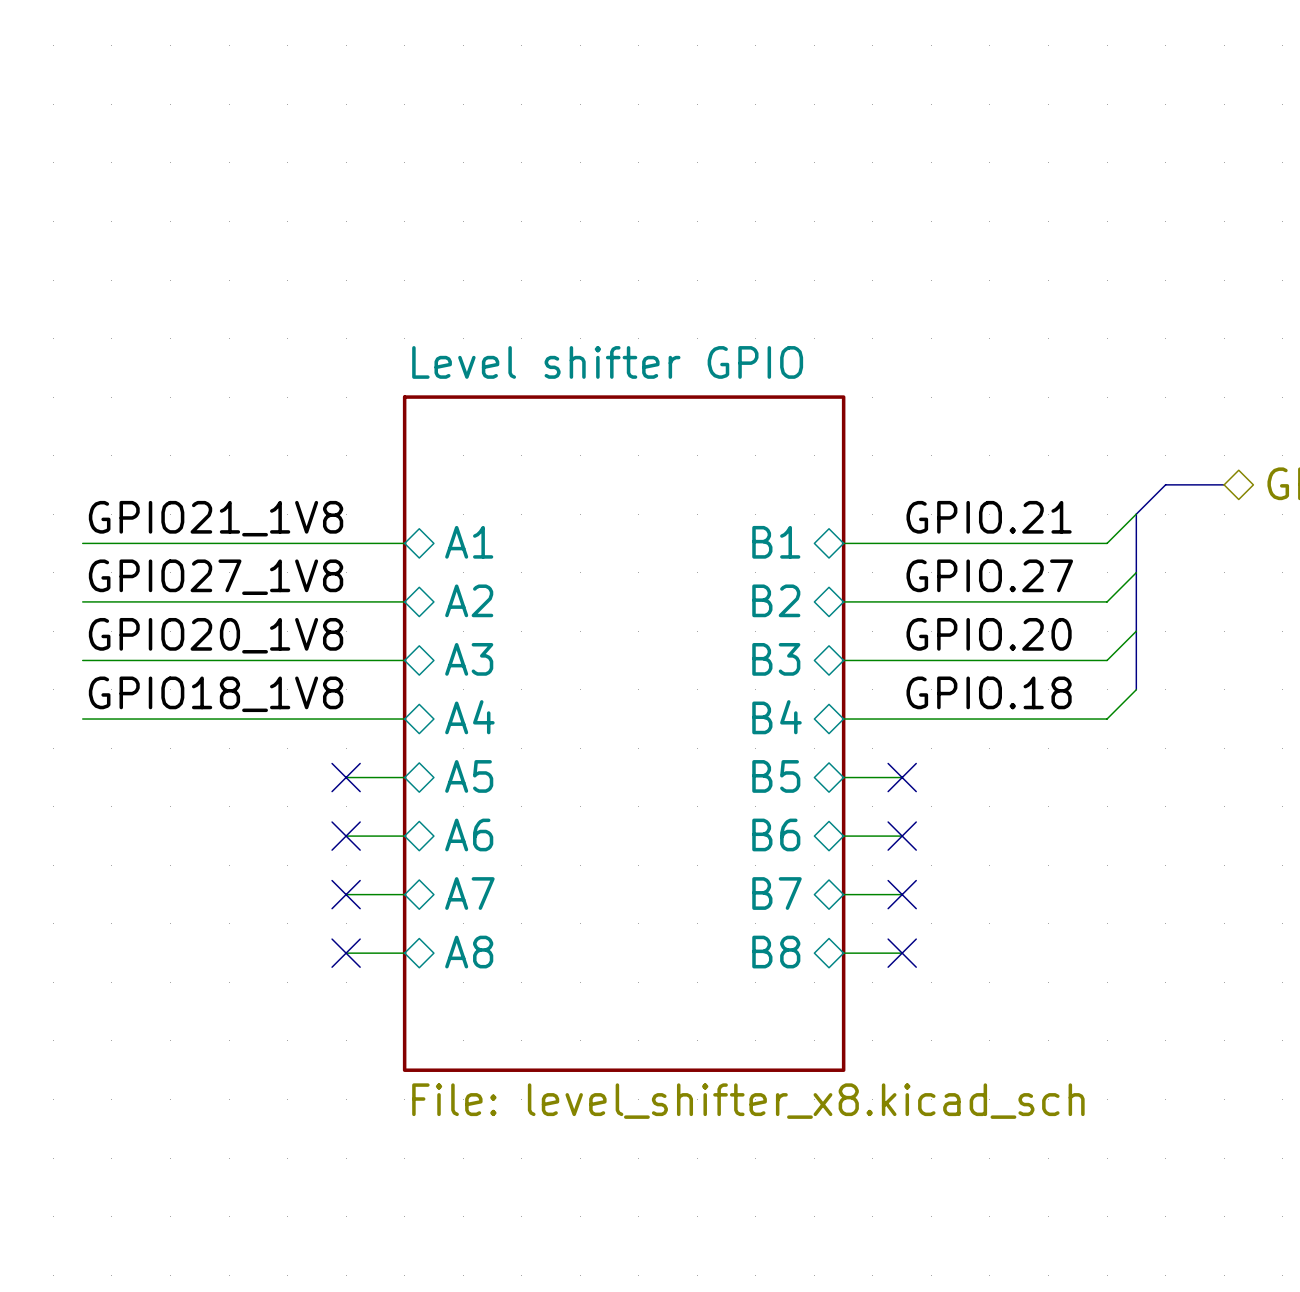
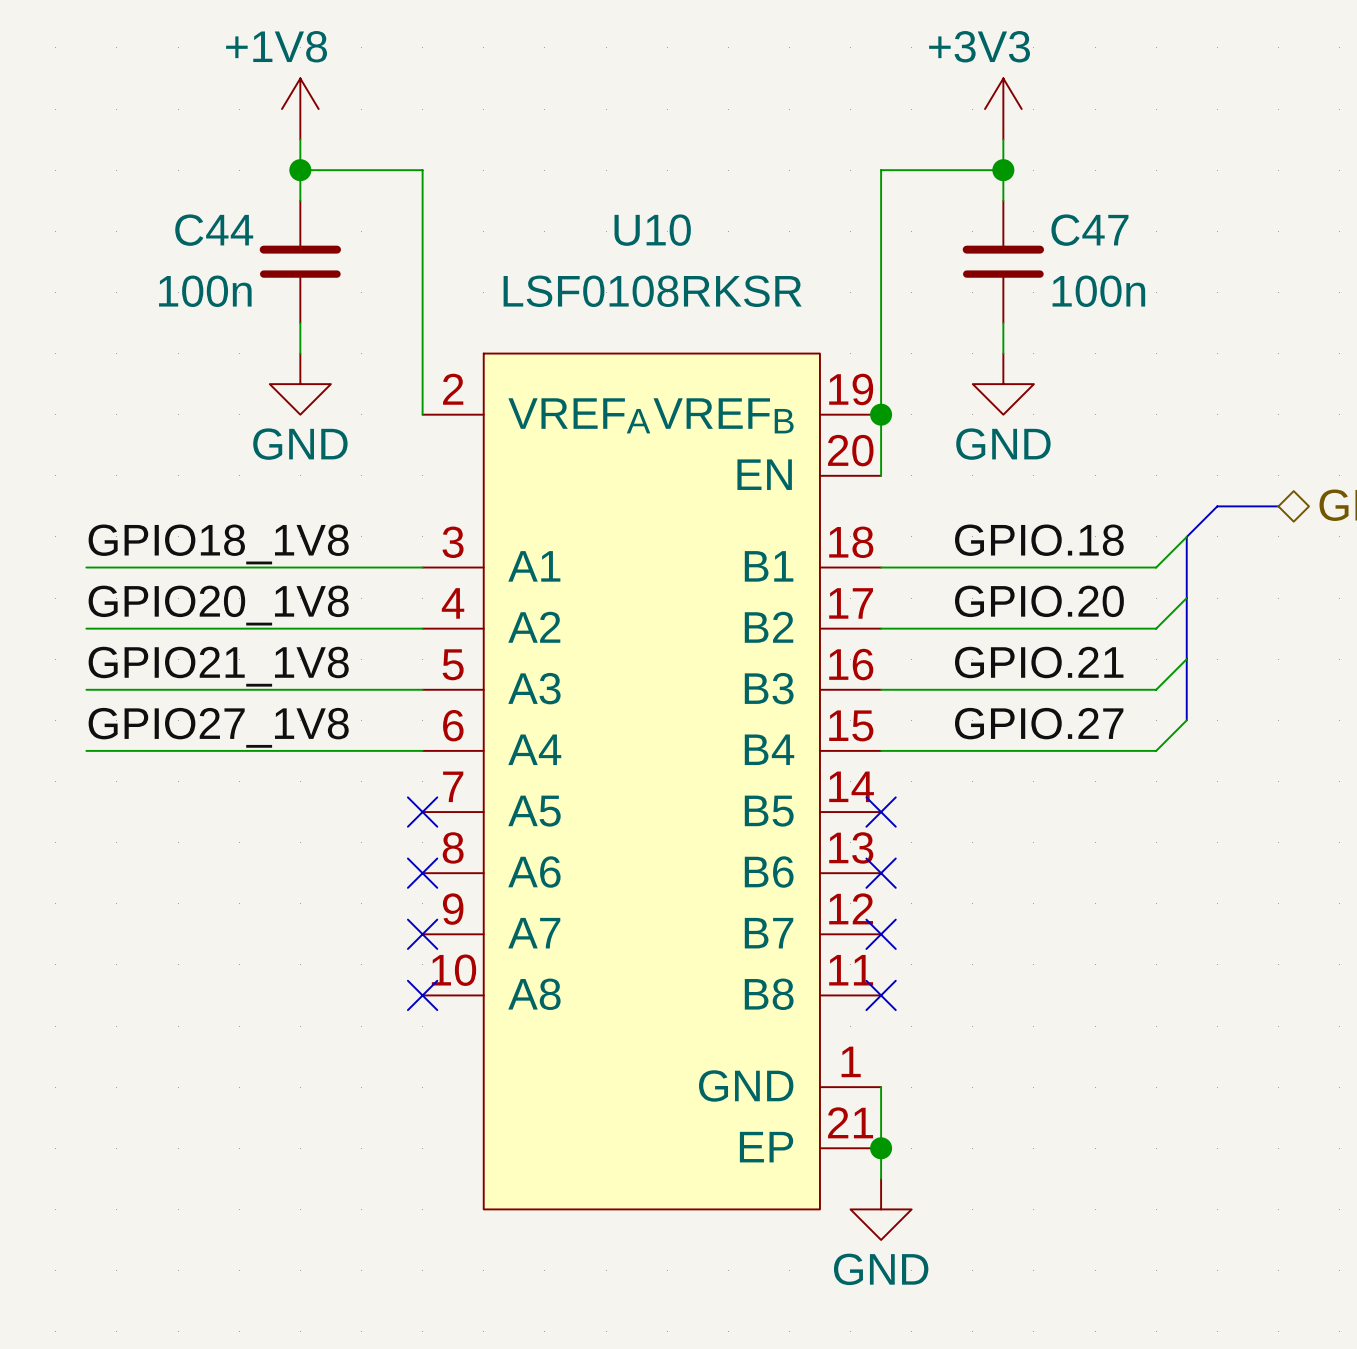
power symbol: none -> +1V8 (300, 109)
power symbol: none -> +3V3 (1003, 109)
wire: none -> (300, 139) (300, 200)
wire: none -> (1003, 139) (1003, 200)
wire: none -> (300, 170) (422, 170) (422, 414)
junction: none -> (300, 170)
wire: none -> (1003, 170) (881, 170) (881, 475)
junction: none -> (1003, 170)
C44: none -> (300, 261)
C47: none -> (1003, 261)
wire: none -> (300, 322) (300, 353)
wire: none -> (1003, 322) (1003, 353)
power symbol: none -> GND (300, 384)
power symbol: none -> GND (1003, 384)
junction: none -> (881, 414)
label: GPIO.21 (989, 517) -> GPIO.18 (1039, 540)
label: GPIO21_1V8 (216, 518) -> GPIO18_1V8 (218, 544)
sheet pin: A1 (469, 542) -> none
sheet pin: B1 (776, 542) -> none
label: GPIO.27 (989, 575) -> GPIO.20 (1039, 601)
label: GPIO27_1V8 (216, 577) -> GPIO20_1V8 (218, 605)
sheet pin: A2 (469, 600) -> none
sheet pin: B2 (776, 600) -> none
label: GPIO.20 (989, 634) -> GPIO.21 (1039, 662)
label: GPIO20_1V8 (216, 635) -> GPIO21_1V8 (218, 666)
sheet pin: A3 (469, 659) -> none
sheet pin: B3 (776, 659) -> none
label: GPIO.18 (989, 692) -> GPIO.27 (1039, 723)
label: GPIO18_1V8 (216, 694) -> GPIO27_1V8 (218, 727)
sheet pin: A4 (469, 717) -> none
sheet pin: B4 (776, 717) -> none
sheet Level shifter GPIO: File: level_shifter_x8.kicad_sch (624, 733) -> none
U10: none -> (651, 781)
sheet pin: A5 (469, 776) -> none
sheet pin: B5 (776, 776) -> none
wire: (346, 777) (404, 777) -> none
no-connect mark: (346, 777) -> none
no-connect mark: none -> (422, 812)
wire: (843, 777) (902, 777) -> none
no-connect mark: none -> (881, 812)
no-connect mark: (902, 777) -> none
sheet pin: A6 (469, 834) -> none
sheet pin: B6 (776, 834) -> none
wire: (346, 836) (404, 836) -> none
no-connect mark: (346, 836) -> none
no-connect mark: none -> (422, 873)
wire: (843, 836) (902, 836) -> none
no-connect mark: none -> (881, 873)
no-connect mark: (902, 836) -> none
sheet pin: A7 (469, 893) -> none
sheet pin: B7 (776, 893) -> none
wire: (346, 894) (404, 894) -> none
no-connect mark: (346, 894) -> none
no-connect mark: none -> (422, 934)
wire: (843, 894) (902, 894) -> none
no-connect mark: none -> (881, 934)
no-connect mark: (902, 894) -> none
sheet pin: A8 (469, 952) -> none
sheet pin: B8 (776, 952) -> none
wire: (346, 953) (404, 953) -> none
no-connect mark: (346, 953) -> none
no-connect mark: none -> (422, 995)
wire: (843, 953) (902, 953) -> none
no-connect mark: none -> (881, 995)
no-connect mark: (902, 953) -> none
wire: none -> (881, 1087) (881, 1178)
junction: none -> (881, 1148)
power symbol: none -> GND (881, 1209)

